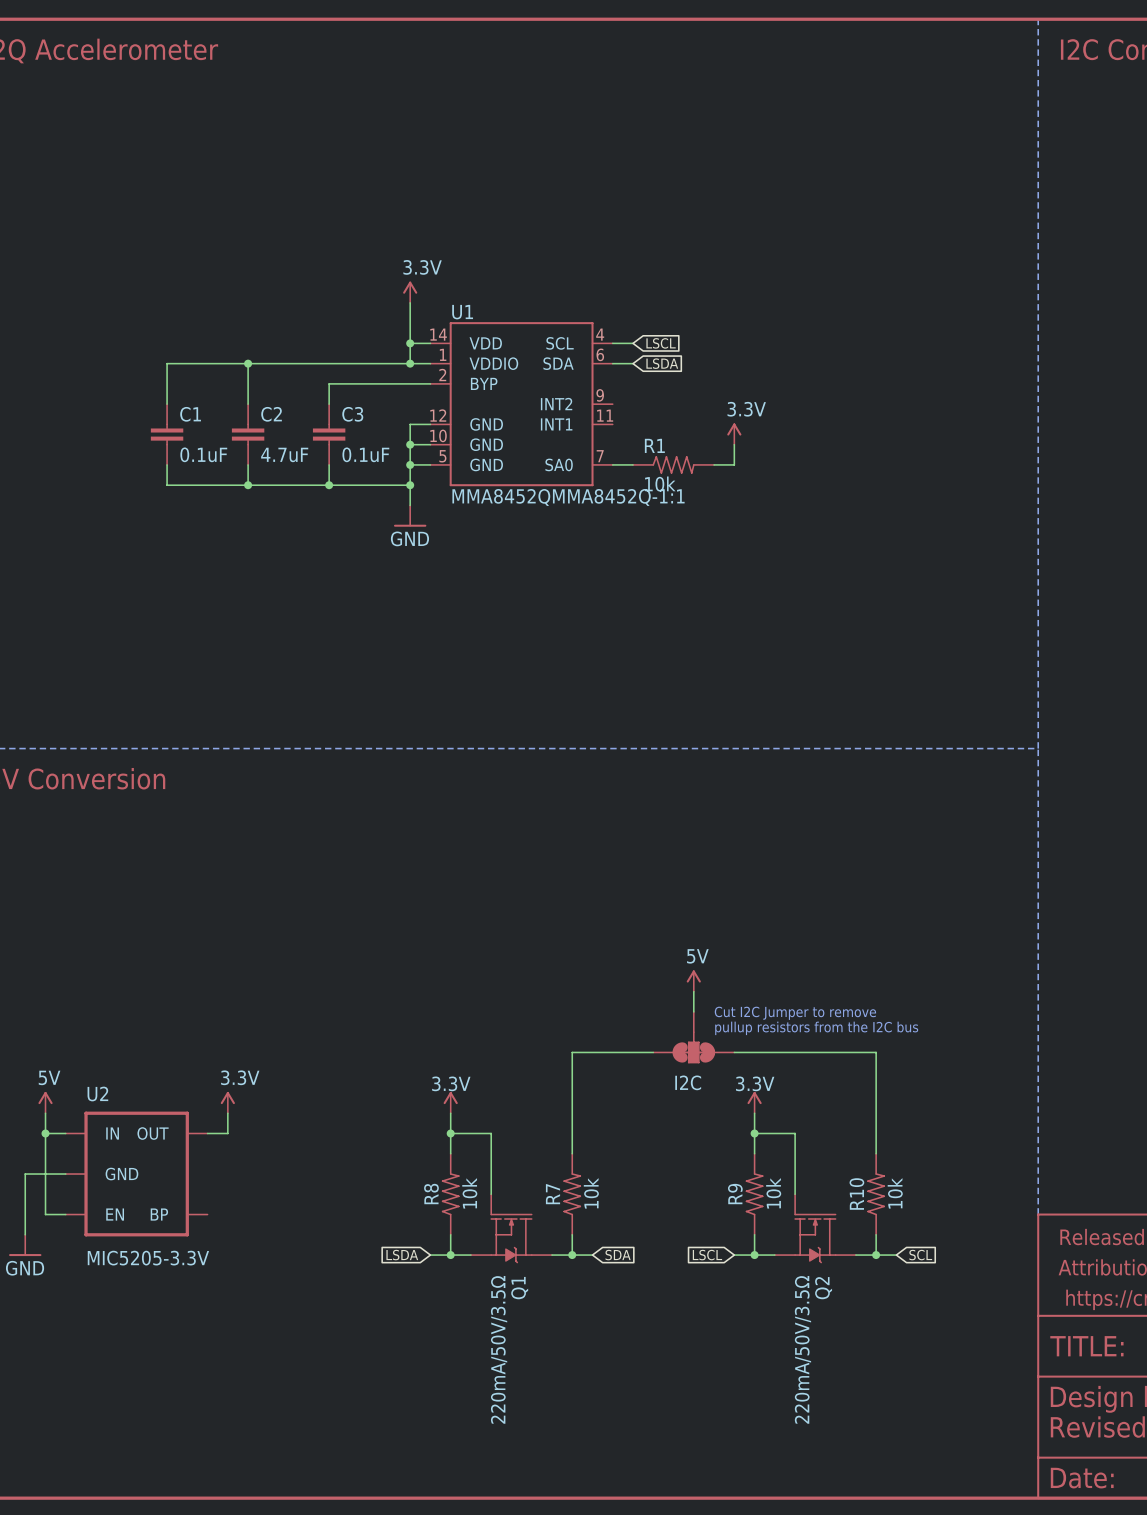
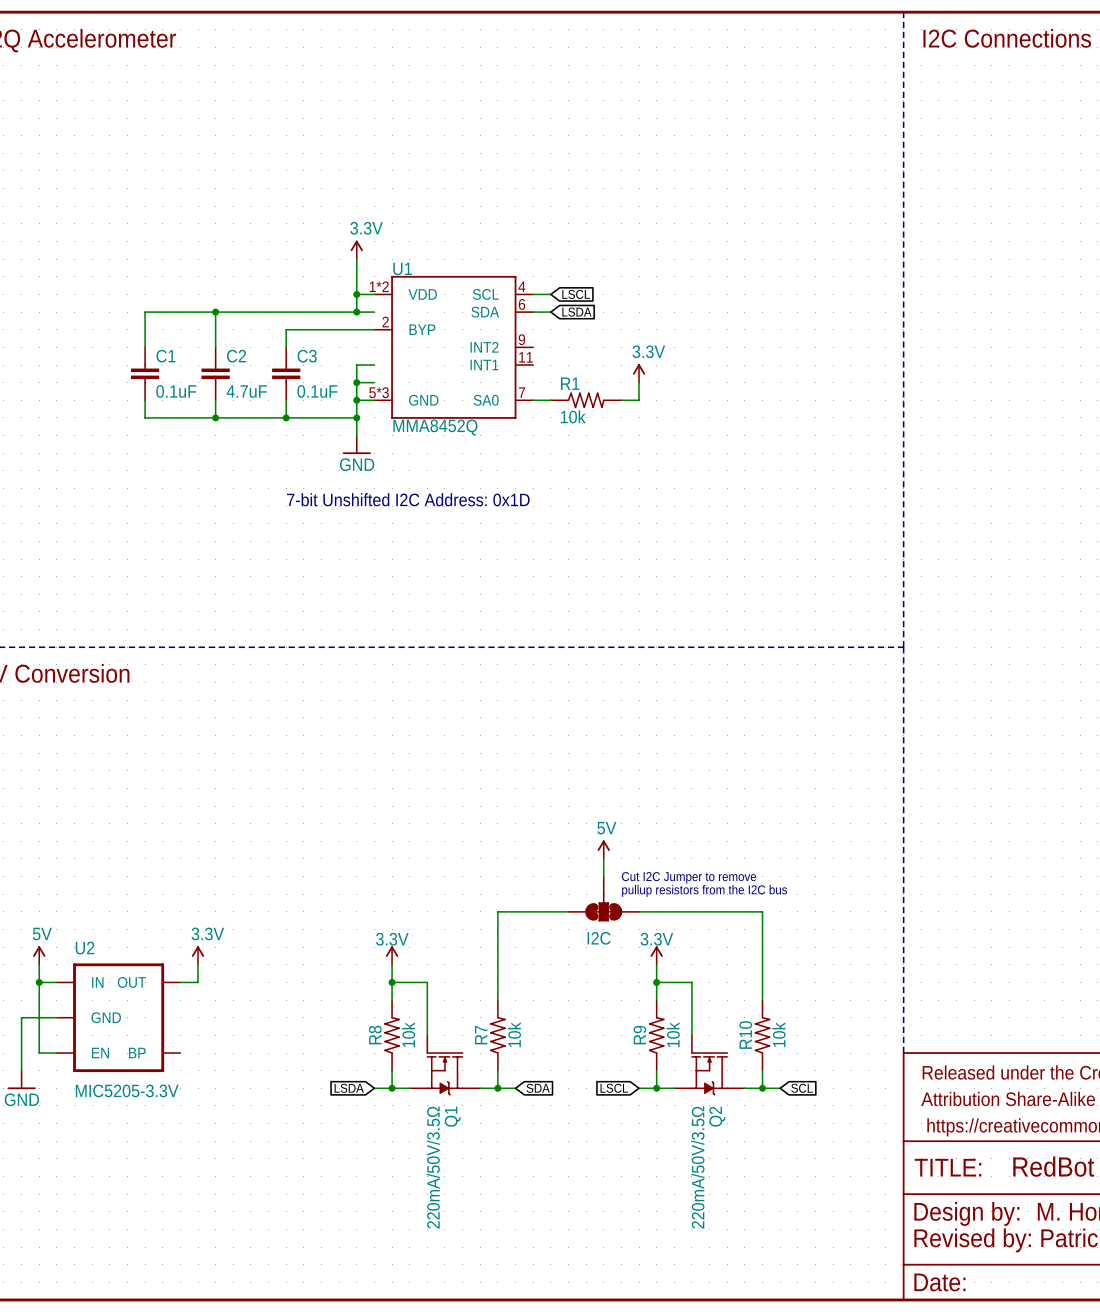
U1 symbol: [430, 322, 613, 487] -> [374, 275, 534, 419]
U1 value: MMA8452QMMA8452Q-1:1 (568, 497) -> MMA8452Q (435, 427)
text: none -> 7-bit Unshifted I2C Address: 0x1D (408, 499)

